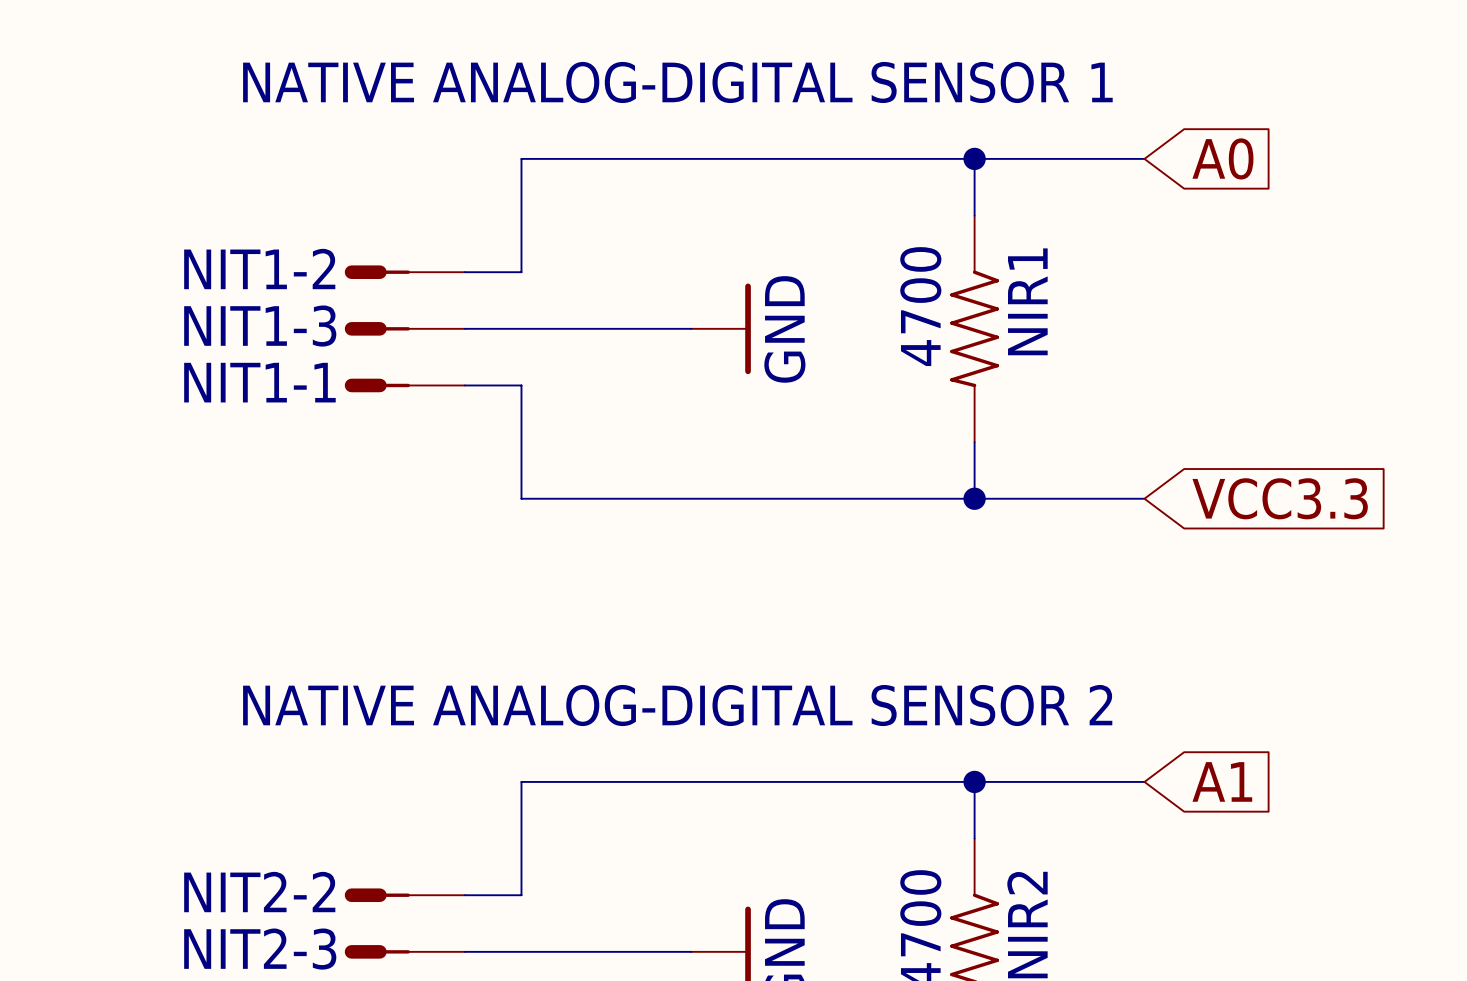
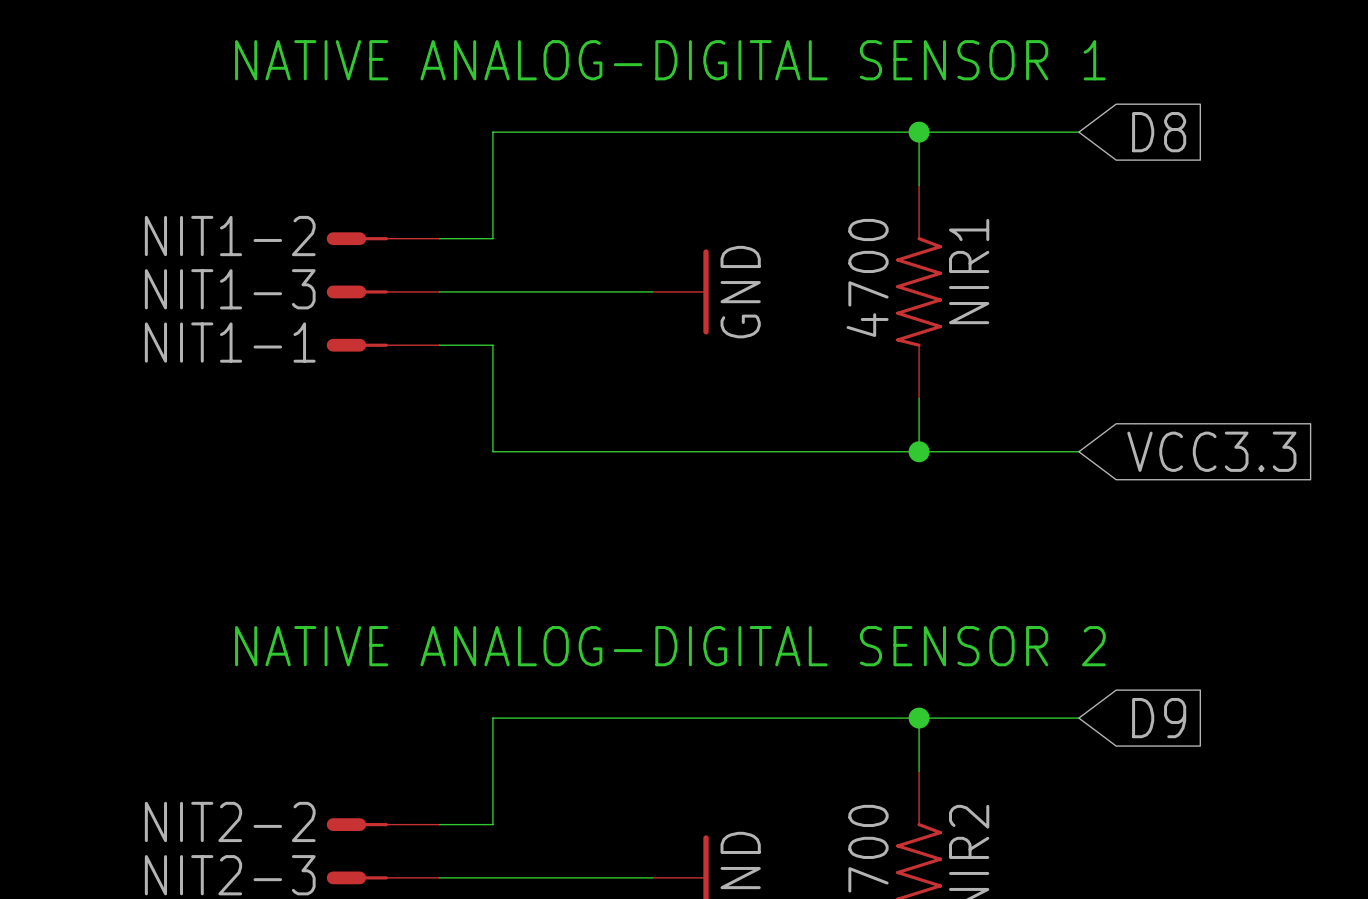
global label: A0 (1222, 158) -> D8 (1159, 132)
global label: A1 (1222, 781) -> D9 (1159, 718)

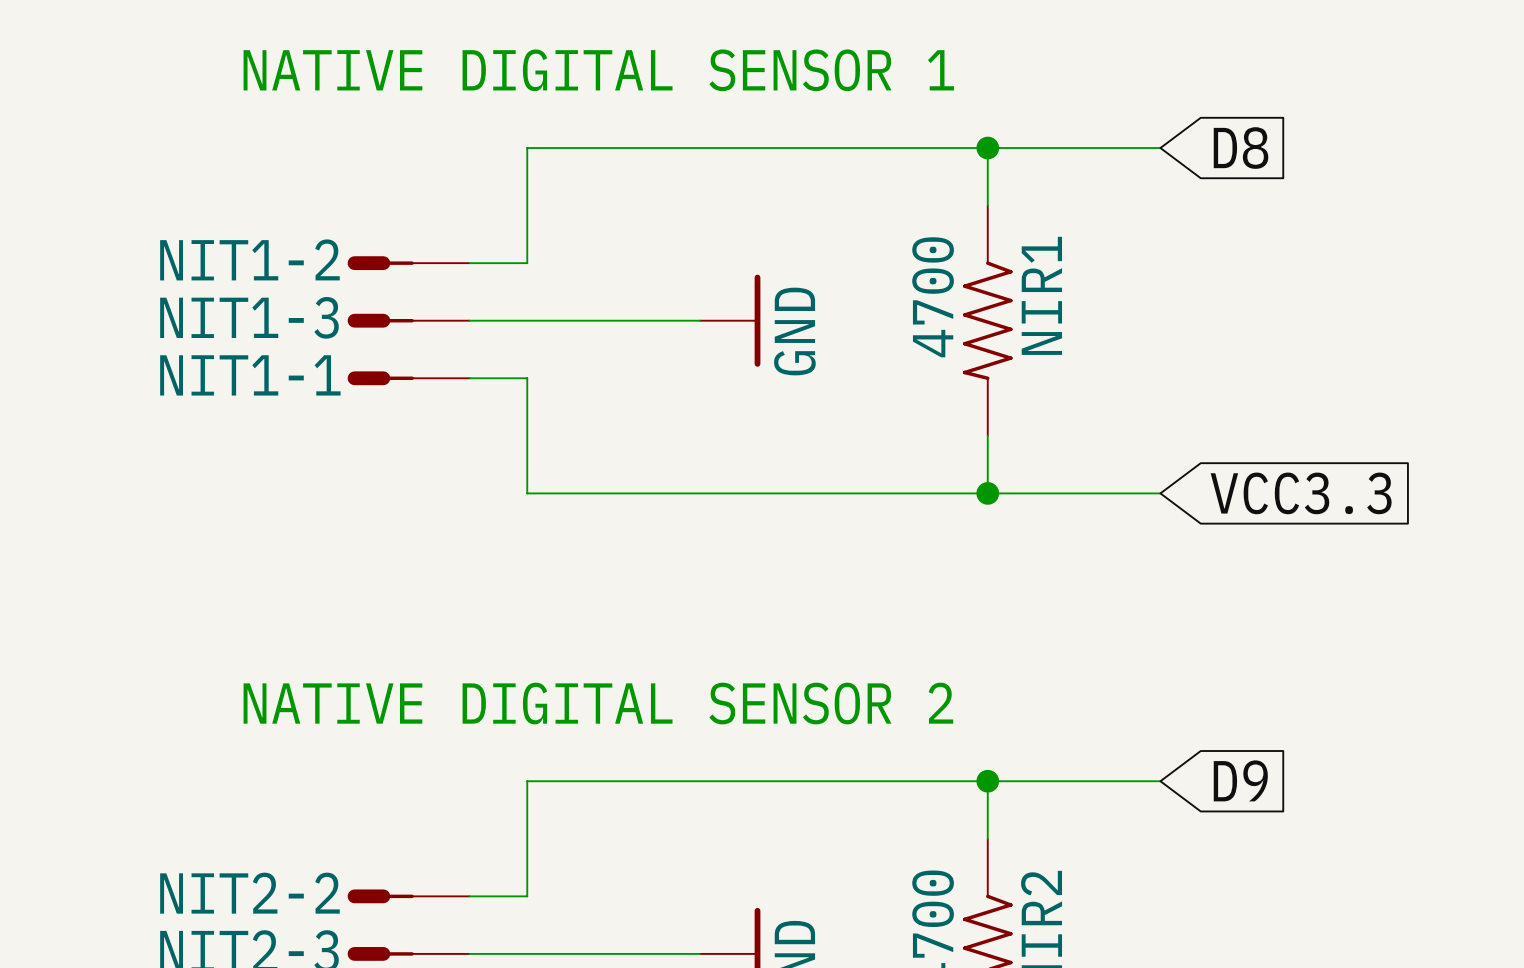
text: NATIVE ANALOG-DIGITAL SENSOR 1 (670, 60) -> NATIVE DIGITAL SENSOR 1 (598, 70)
text: NATIVE ANALOG-DIGITAL SENSOR 2 (670, 646) -> NATIVE DIGITAL SENSOR 2 (598, 703)

